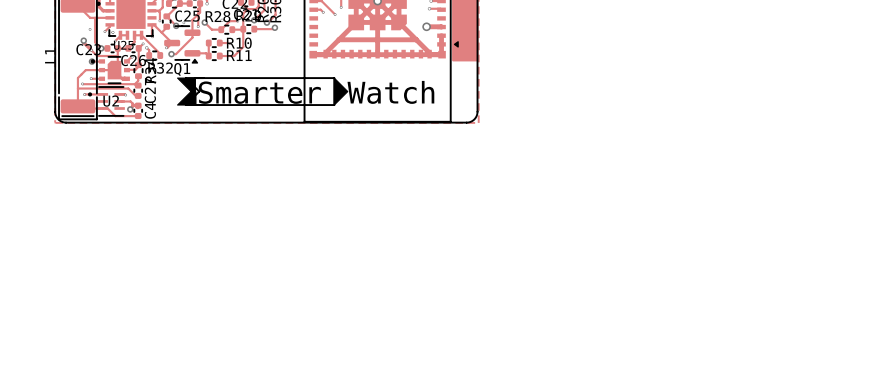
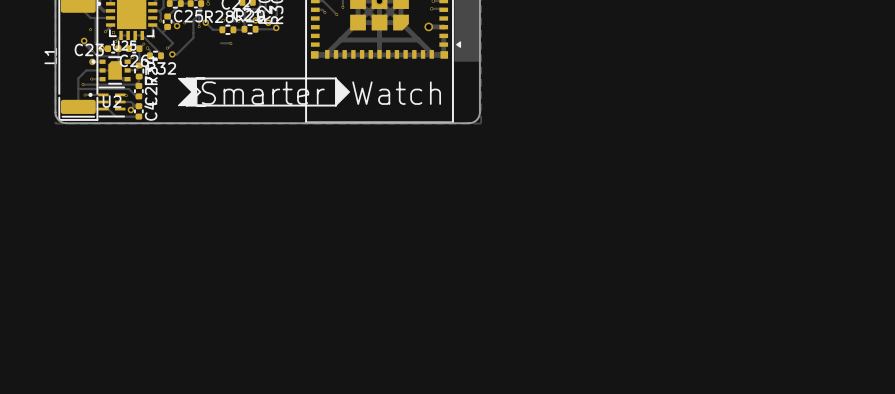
track: (243, 29) (243, 47) (234, 56) (219, 56) -> none
track: (208, 43) (208, 56) (206, 53) (192, 53) -> none
R10: (214, 43) -> none
Q1: (182, 44) -> none
R11: (214, 56) -> none

